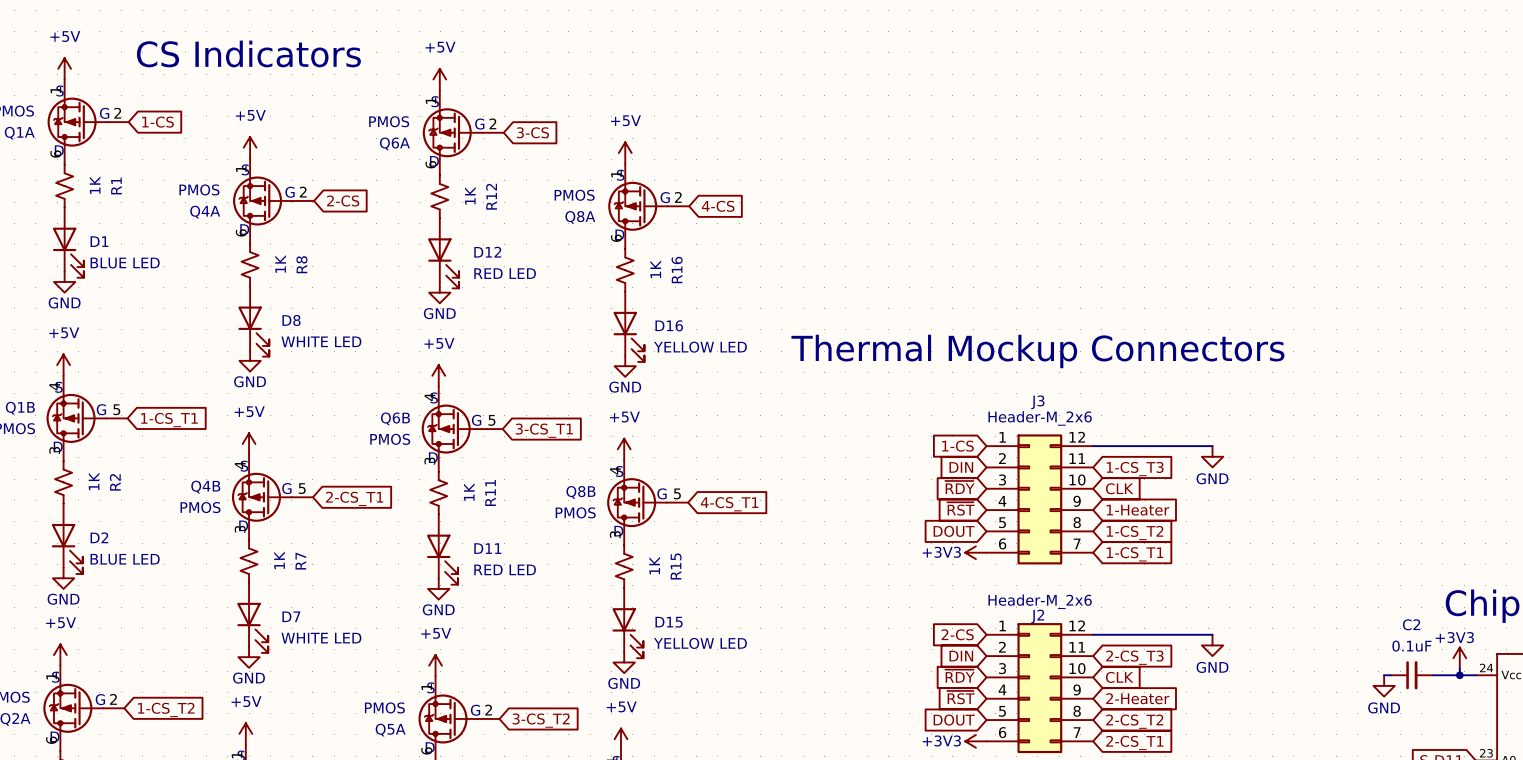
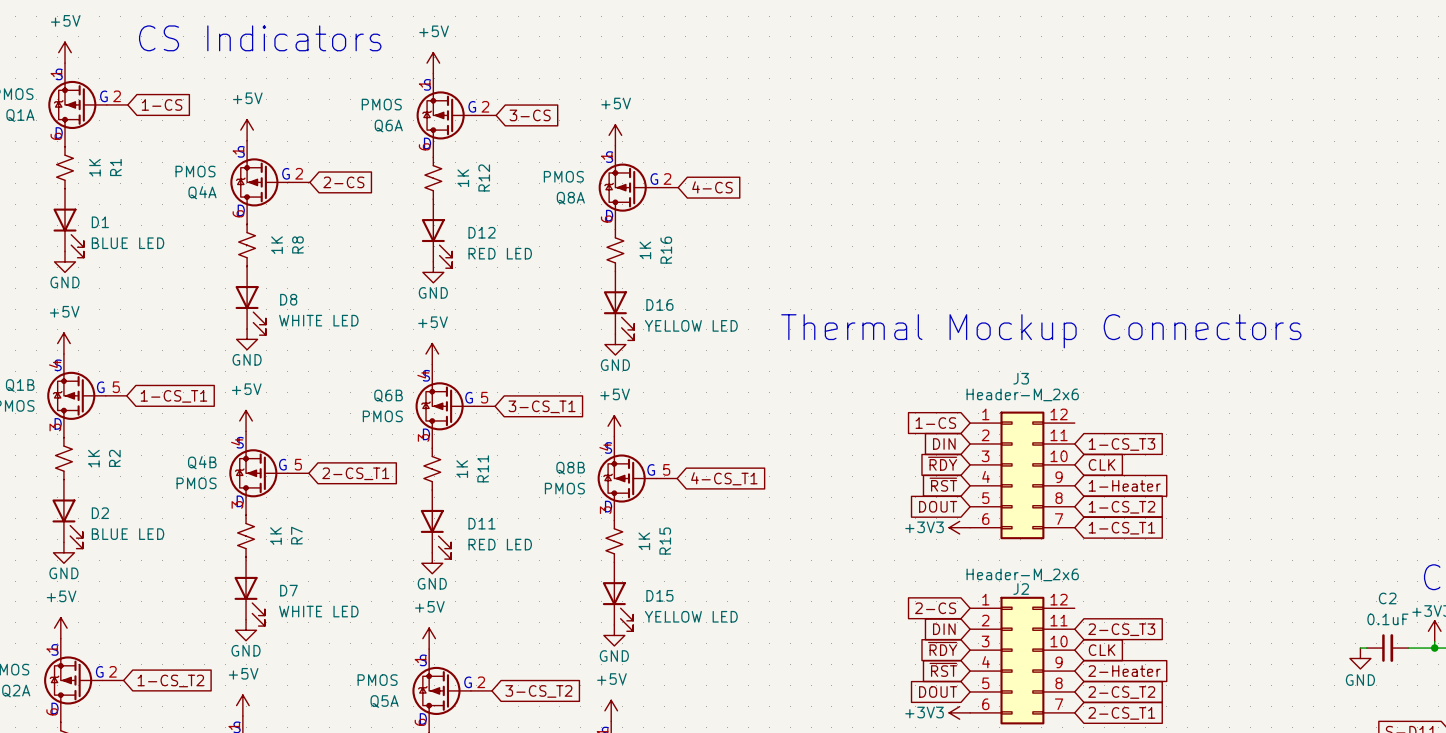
wire: (1093, 446) (1212, 446) -> none
power symbol: GND (1212, 456) -> none
wire: (1093, 634) (1212, 634) -> none
power symbol: GND (1212, 645) -> none

